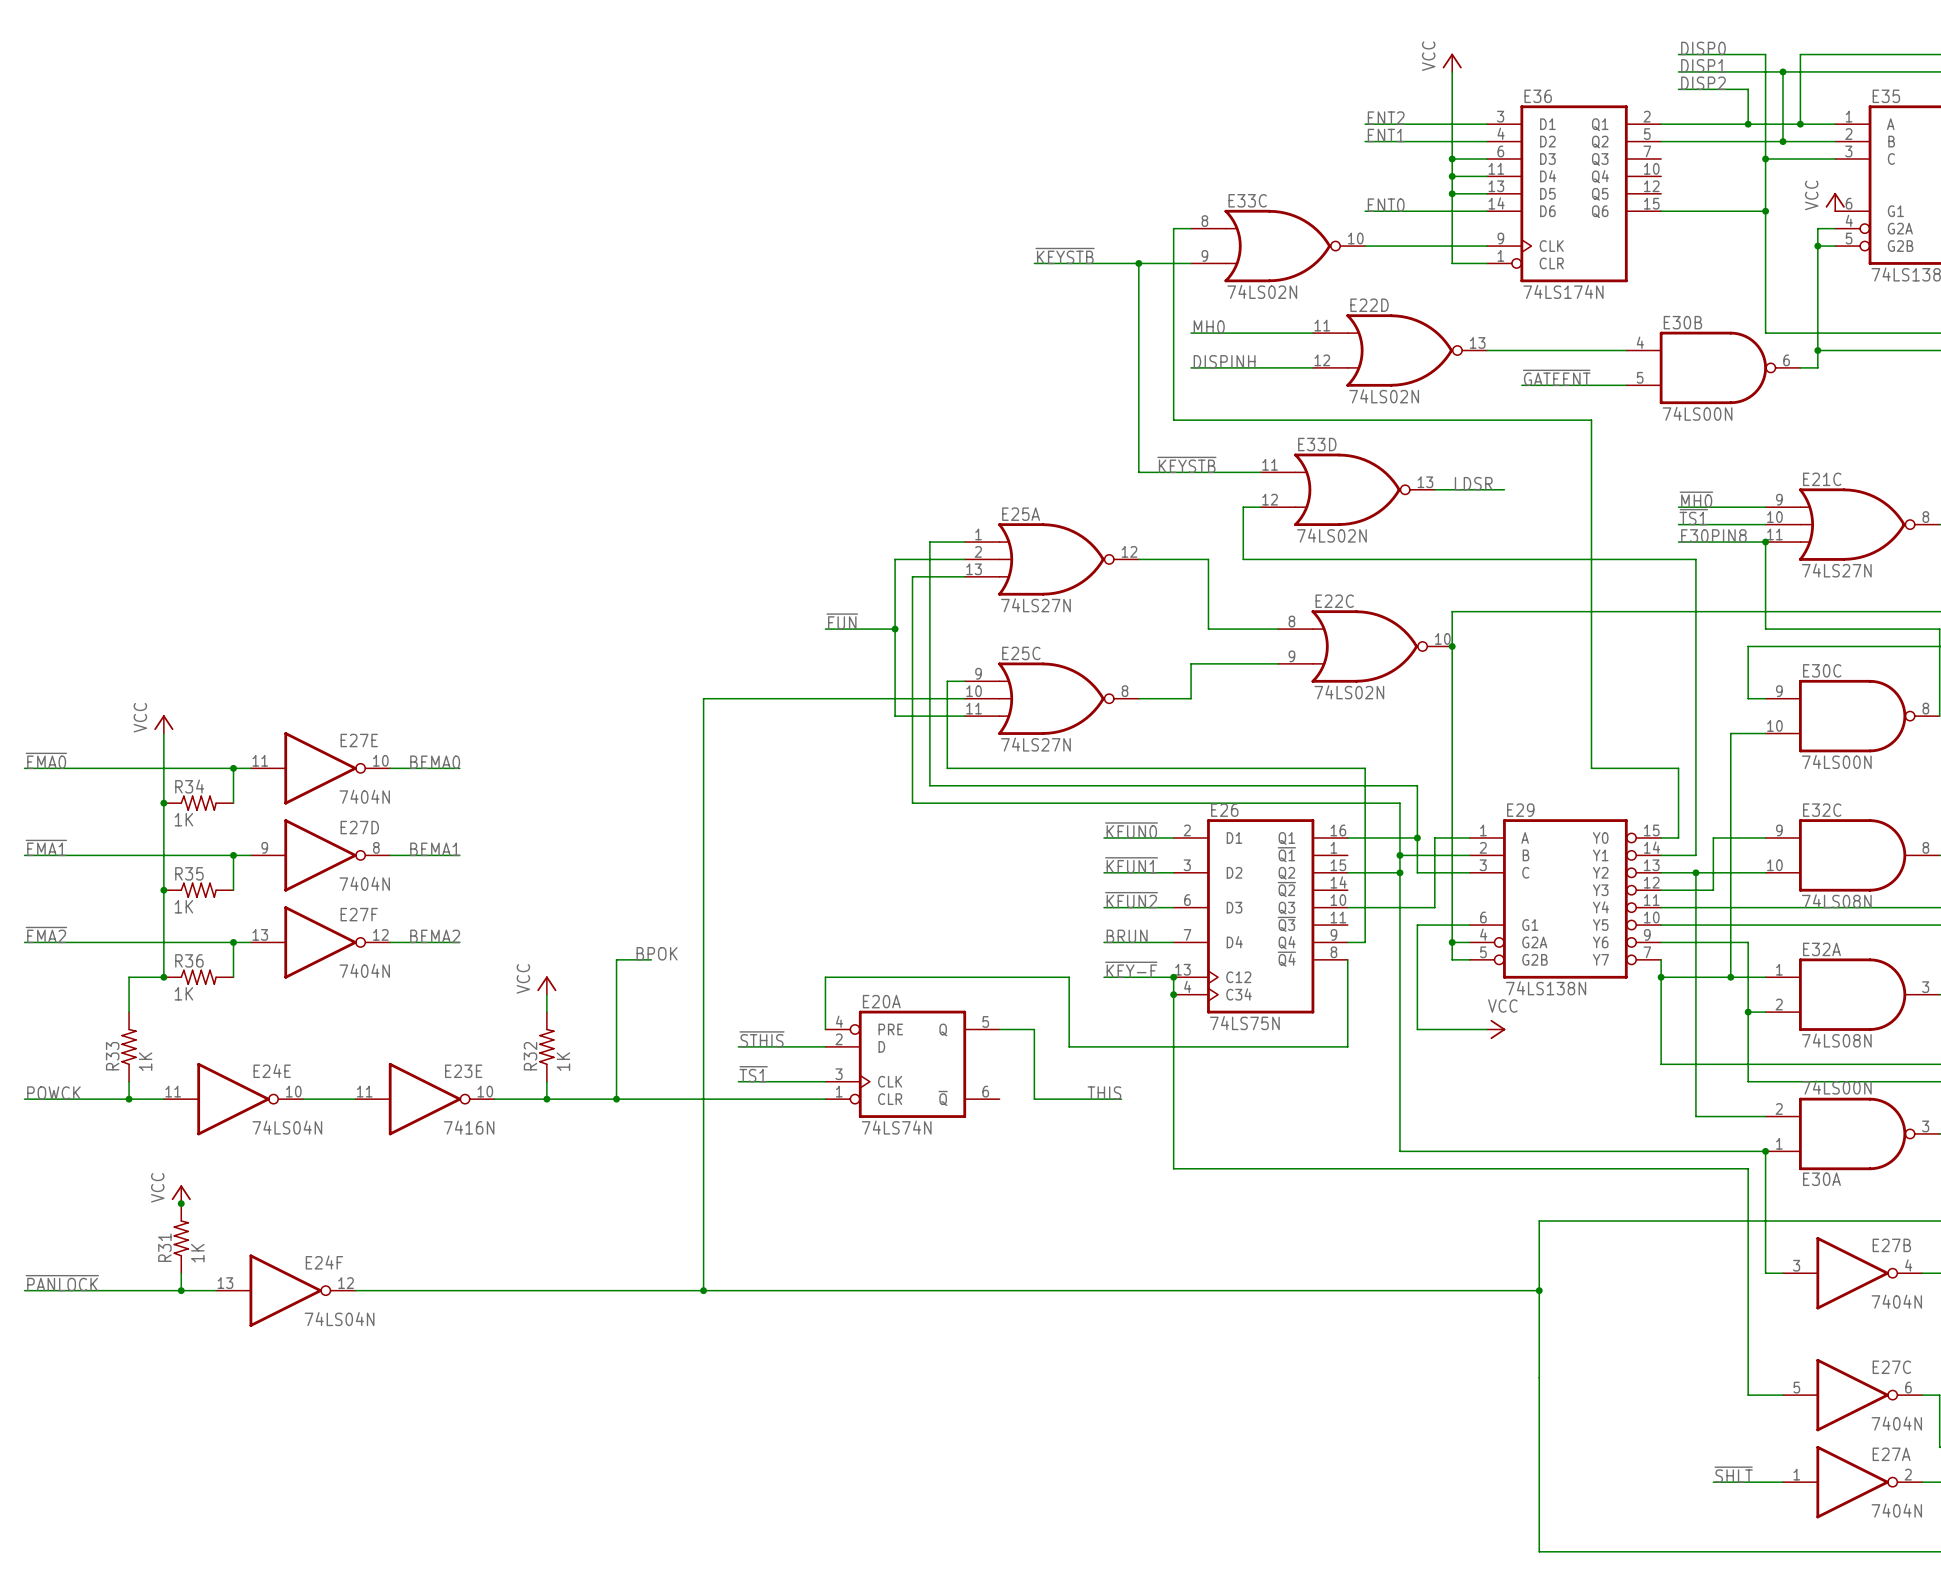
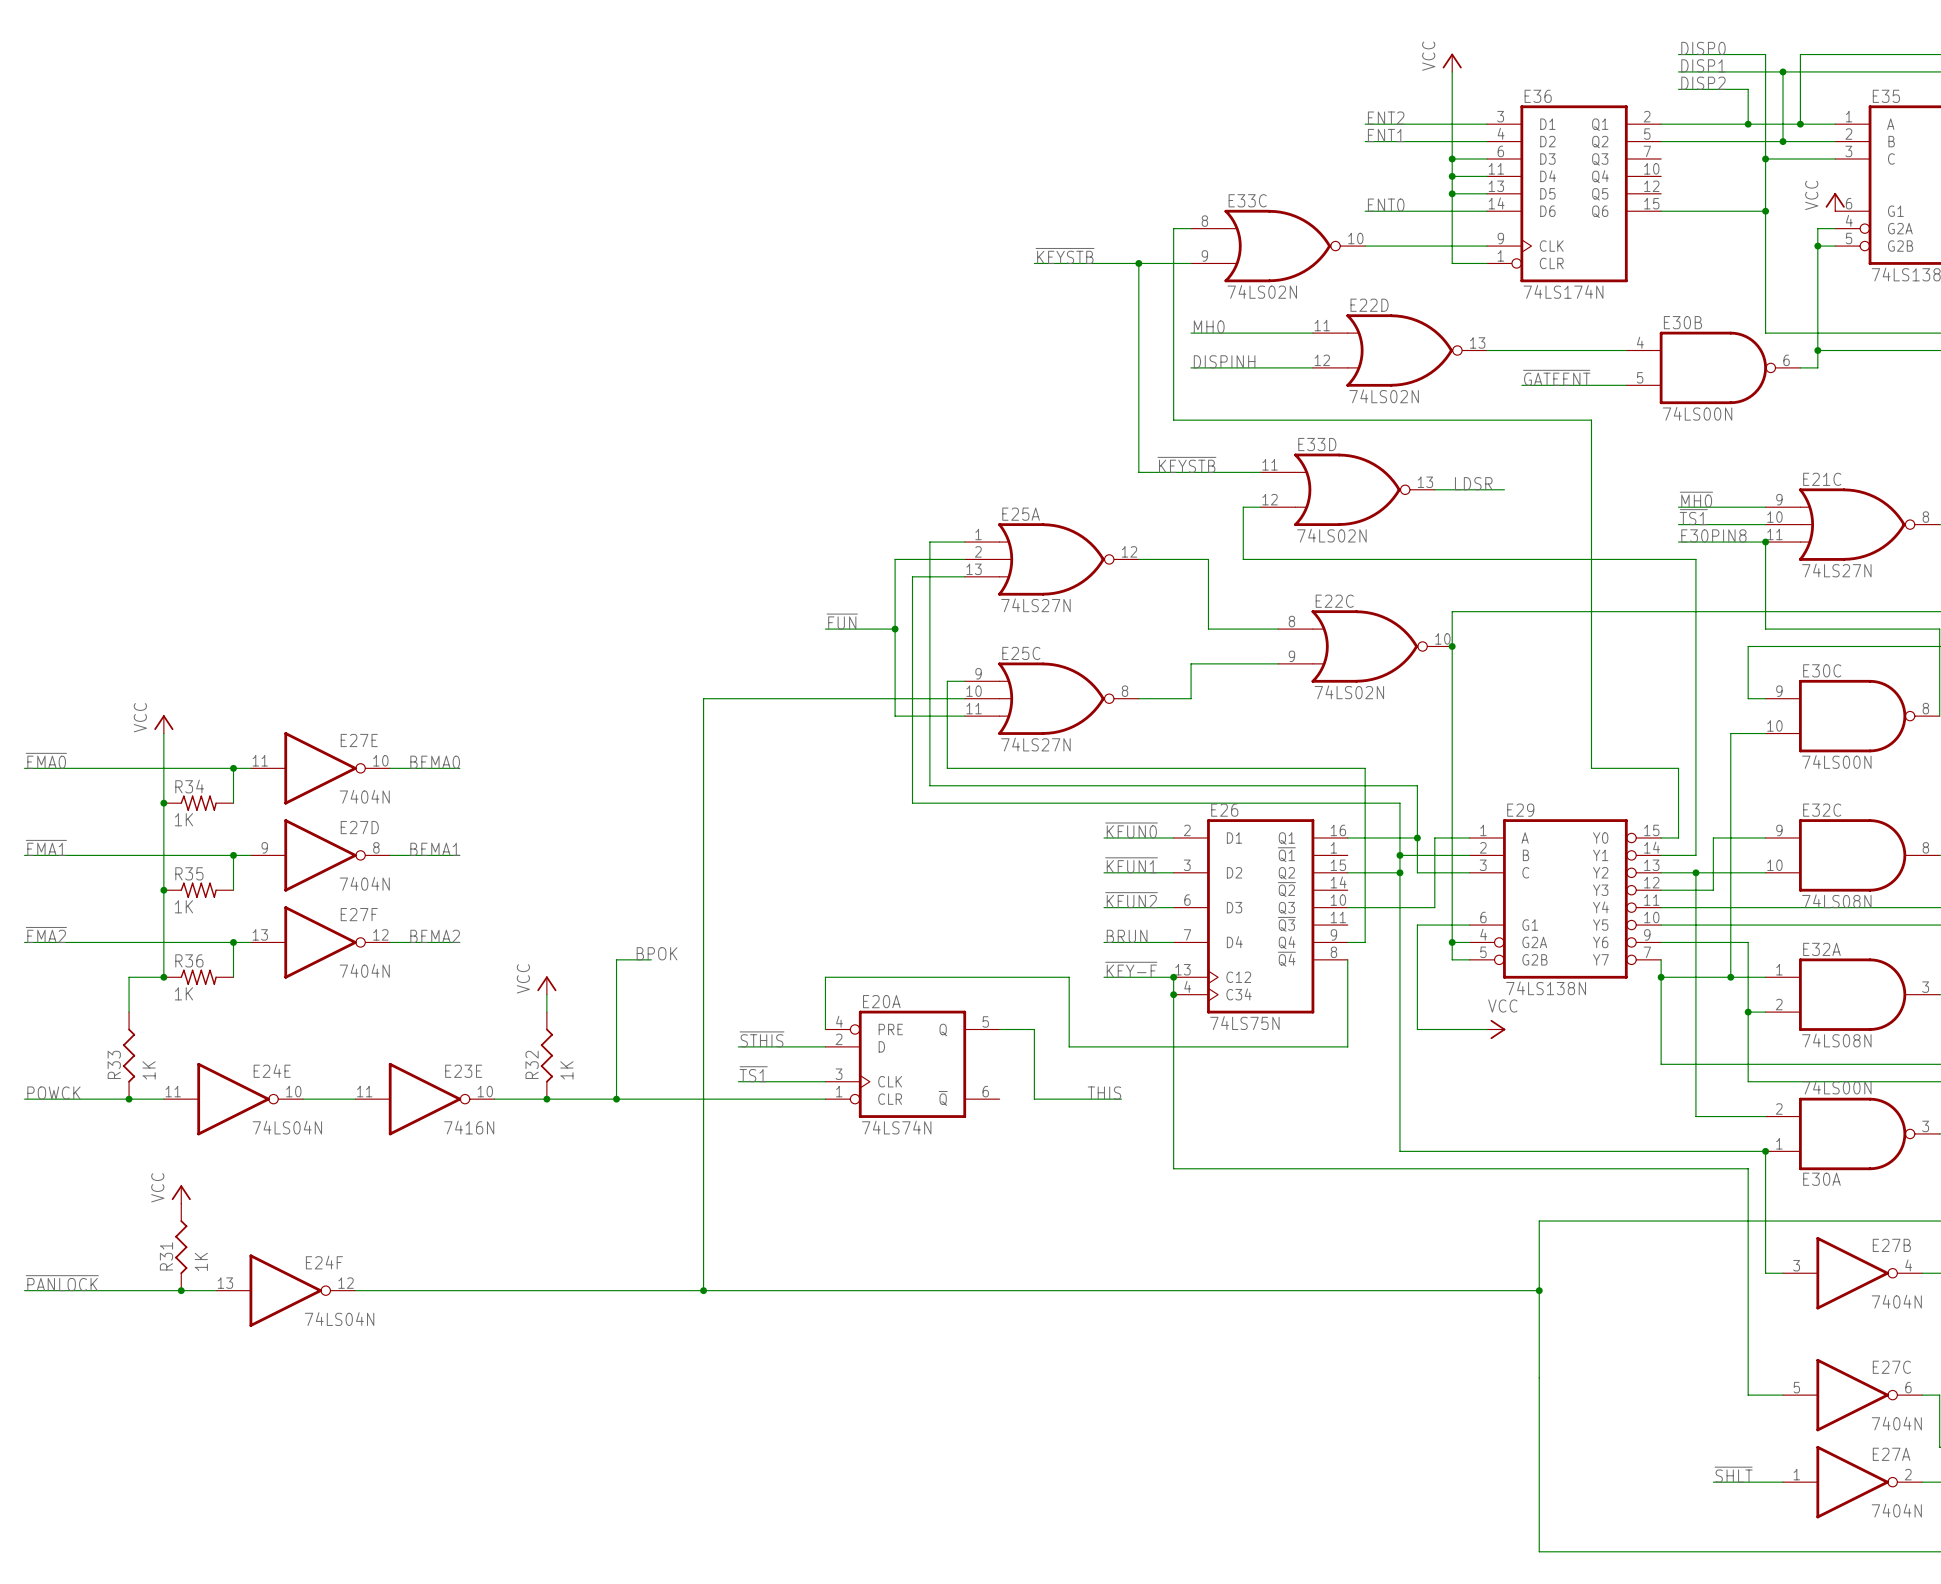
R33 symbol: [121, 1012, 137, 1082] -> [122, 1012, 136, 1100]
R32 symbol: [539, 1012, 555, 1082] -> [540, 1012, 553, 1100]
R31 symbol: [173, 1203, 189, 1274] -> [175, 1203, 188, 1291]
junction: (181, 1203) -> none

